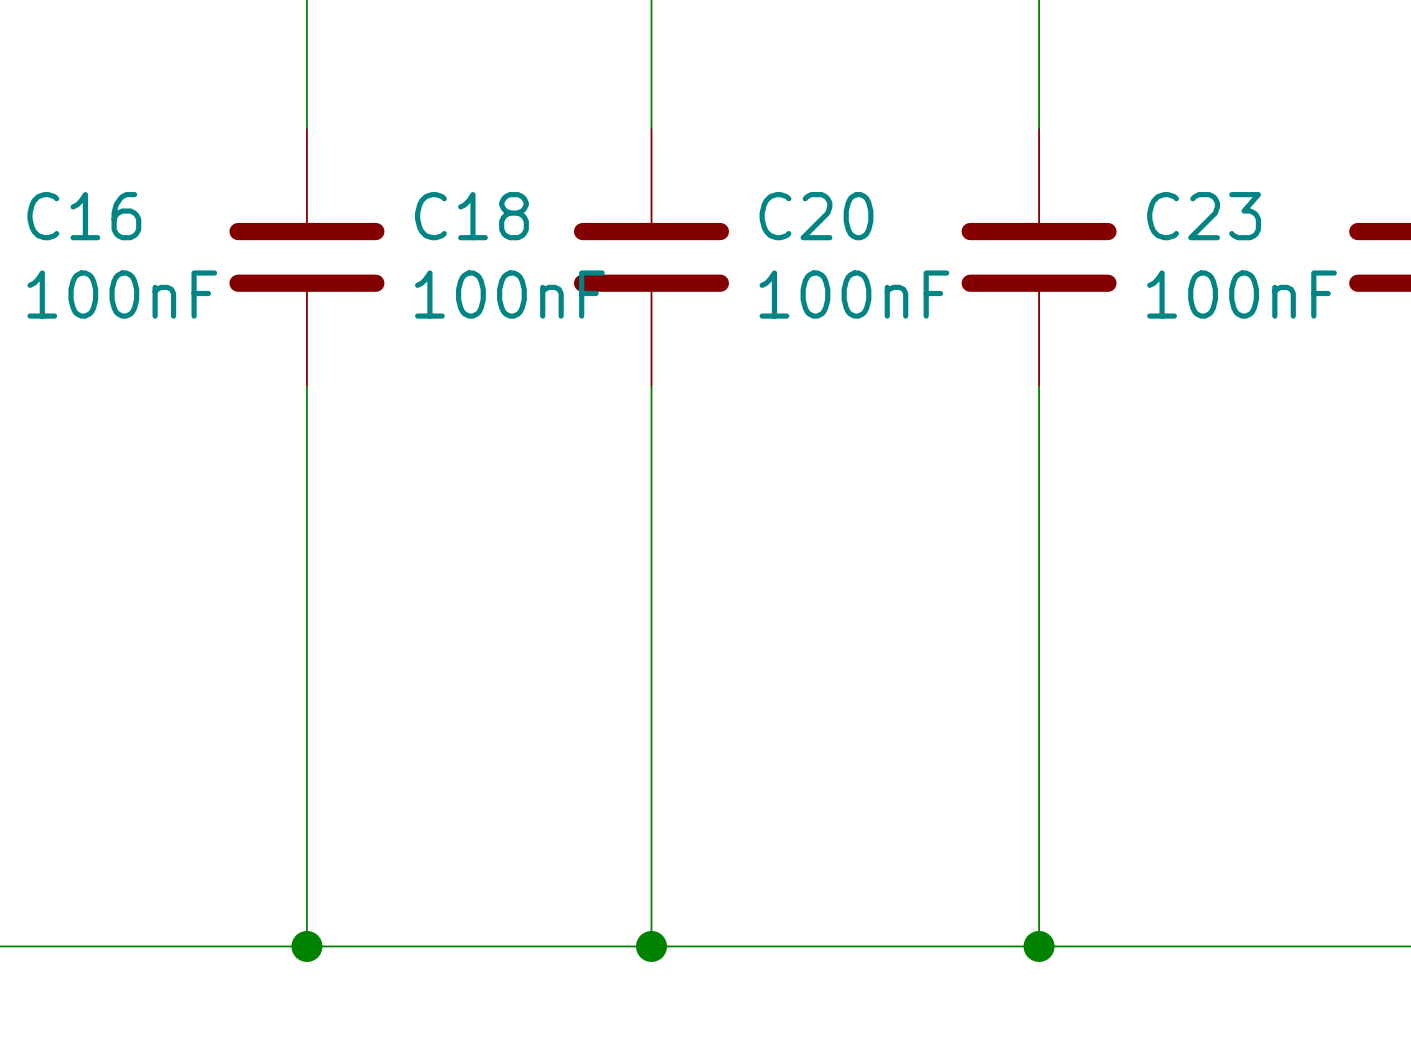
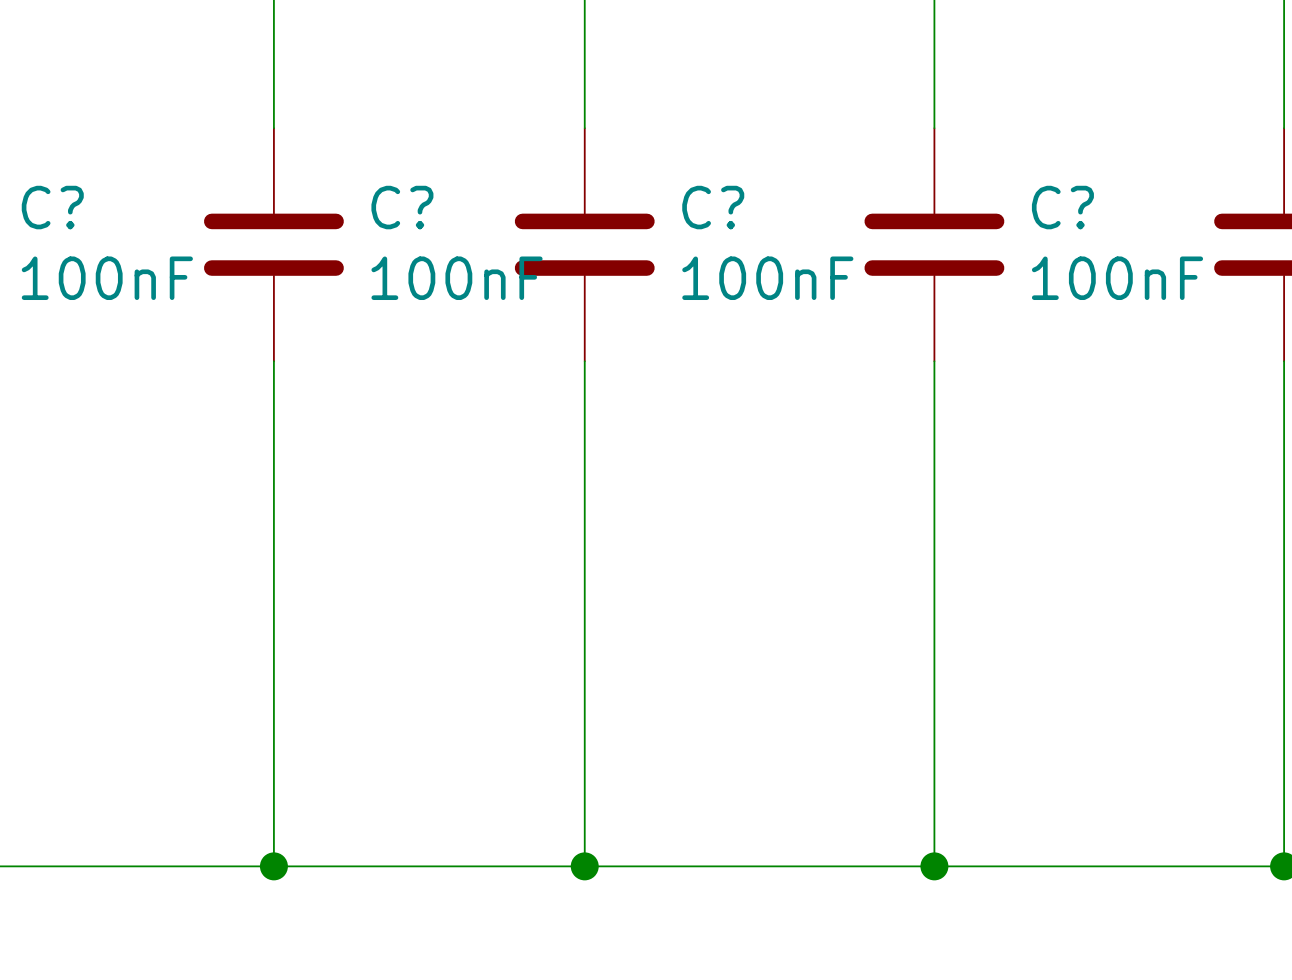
C16 name: C16 (84, 216) -> C? (52, 207)
C18 name: C18 (471, 216) -> C? (402, 207)
C20 name: C20 (816, 216) -> C? (713, 207)
C23 name: C23 (1204, 216) -> C? (1062, 207)

